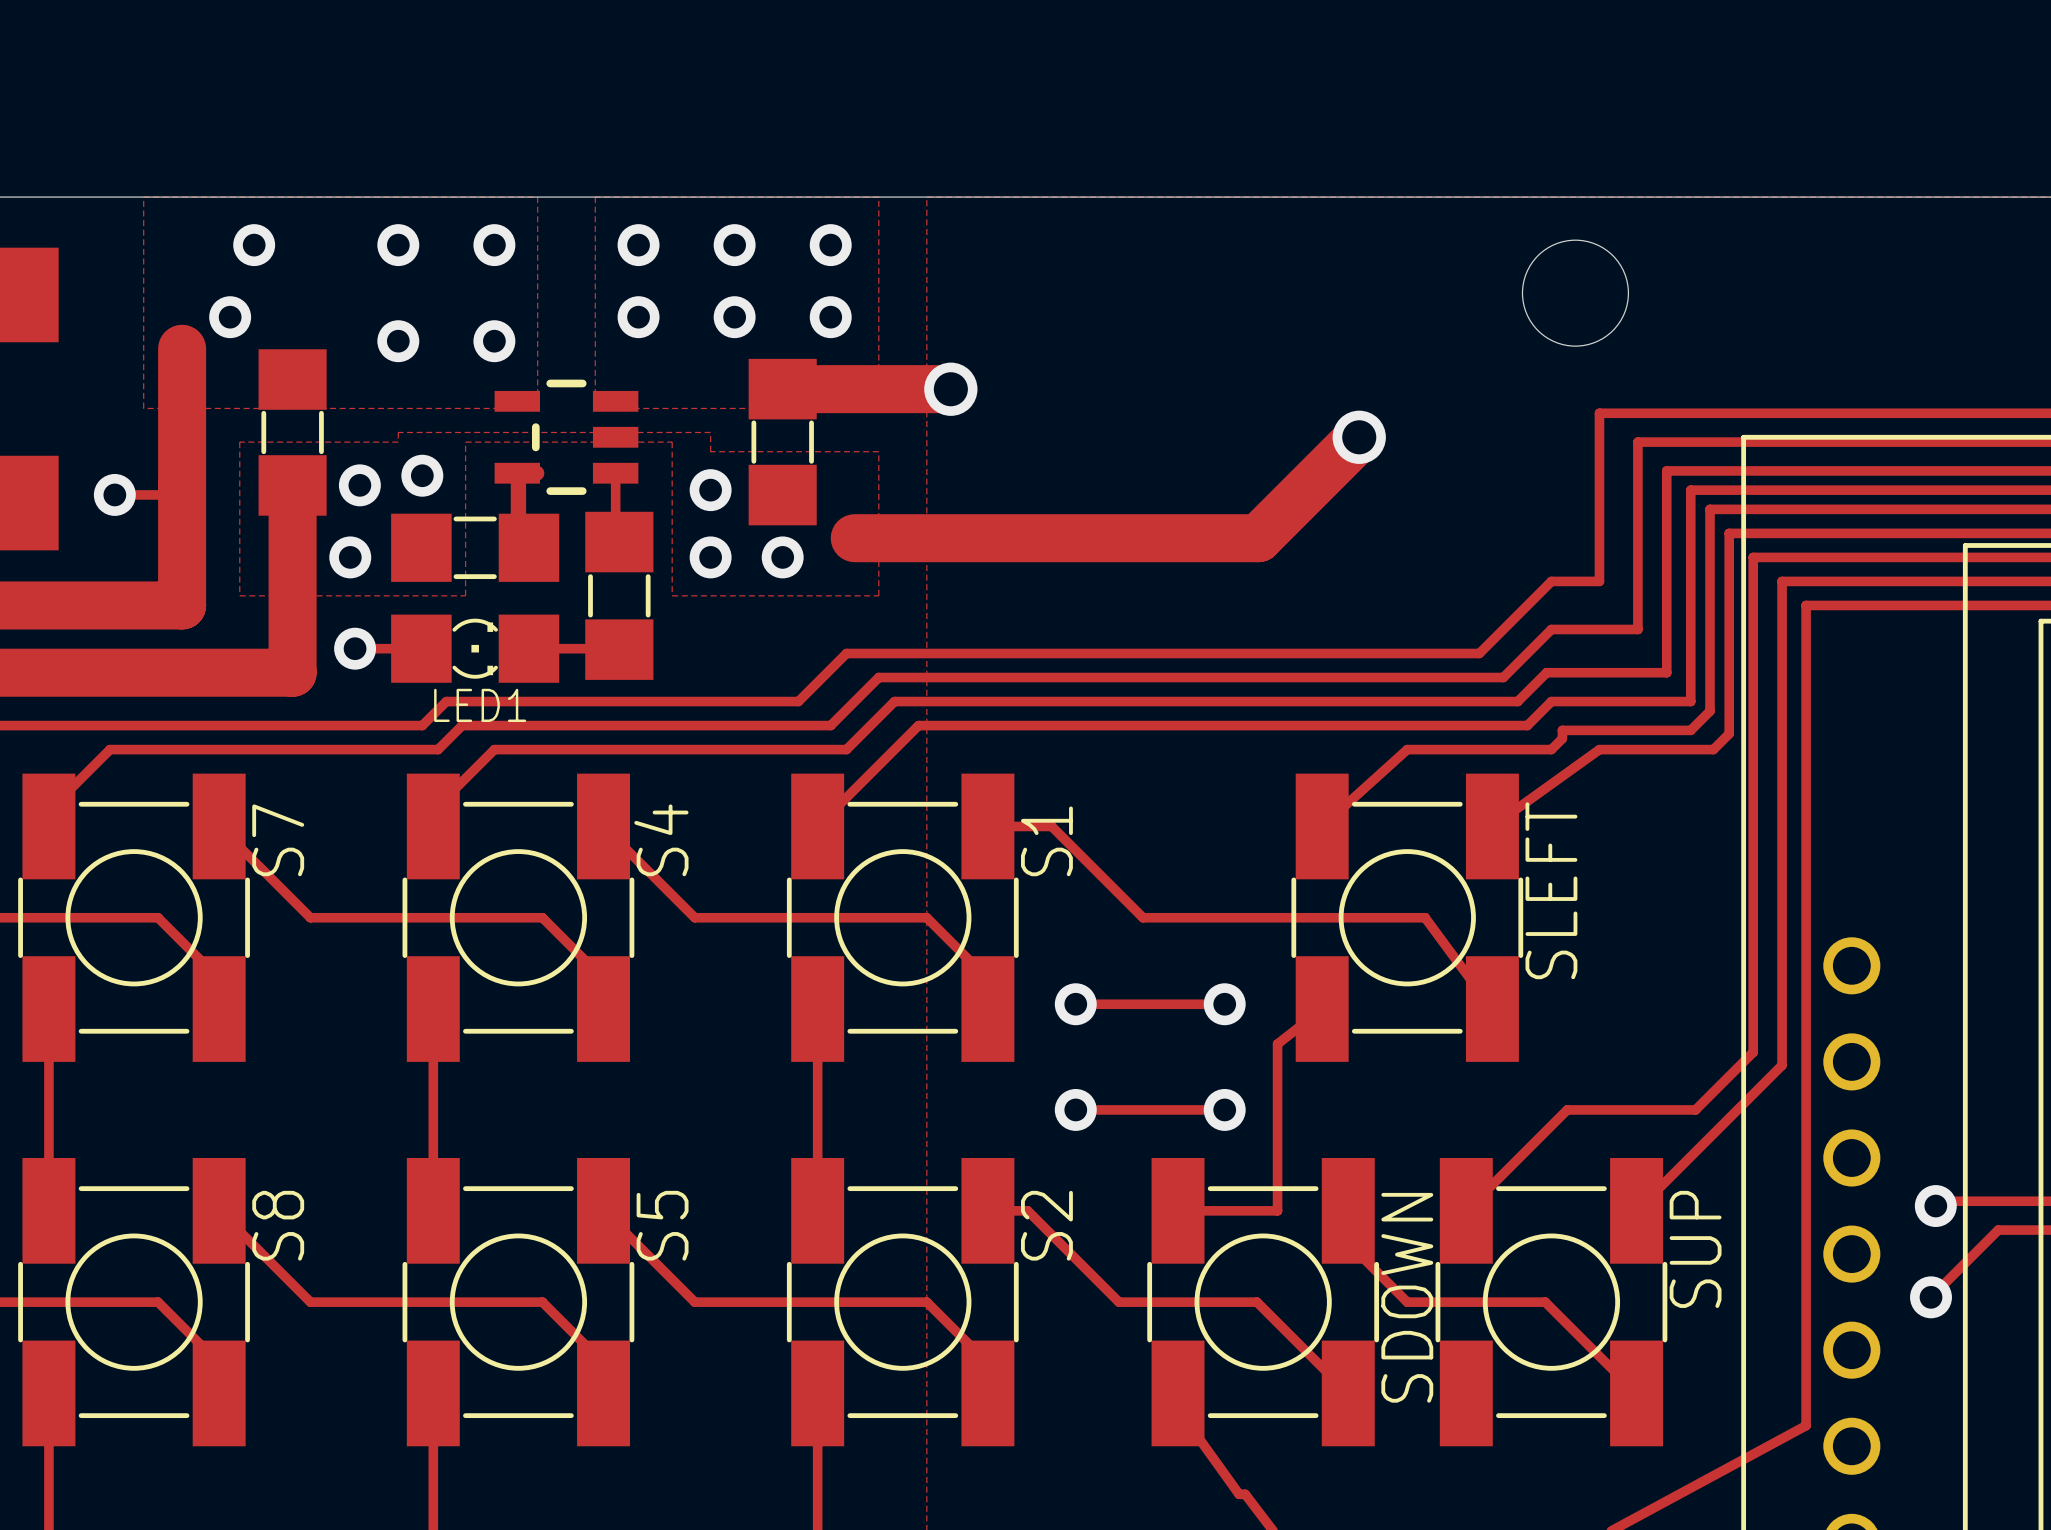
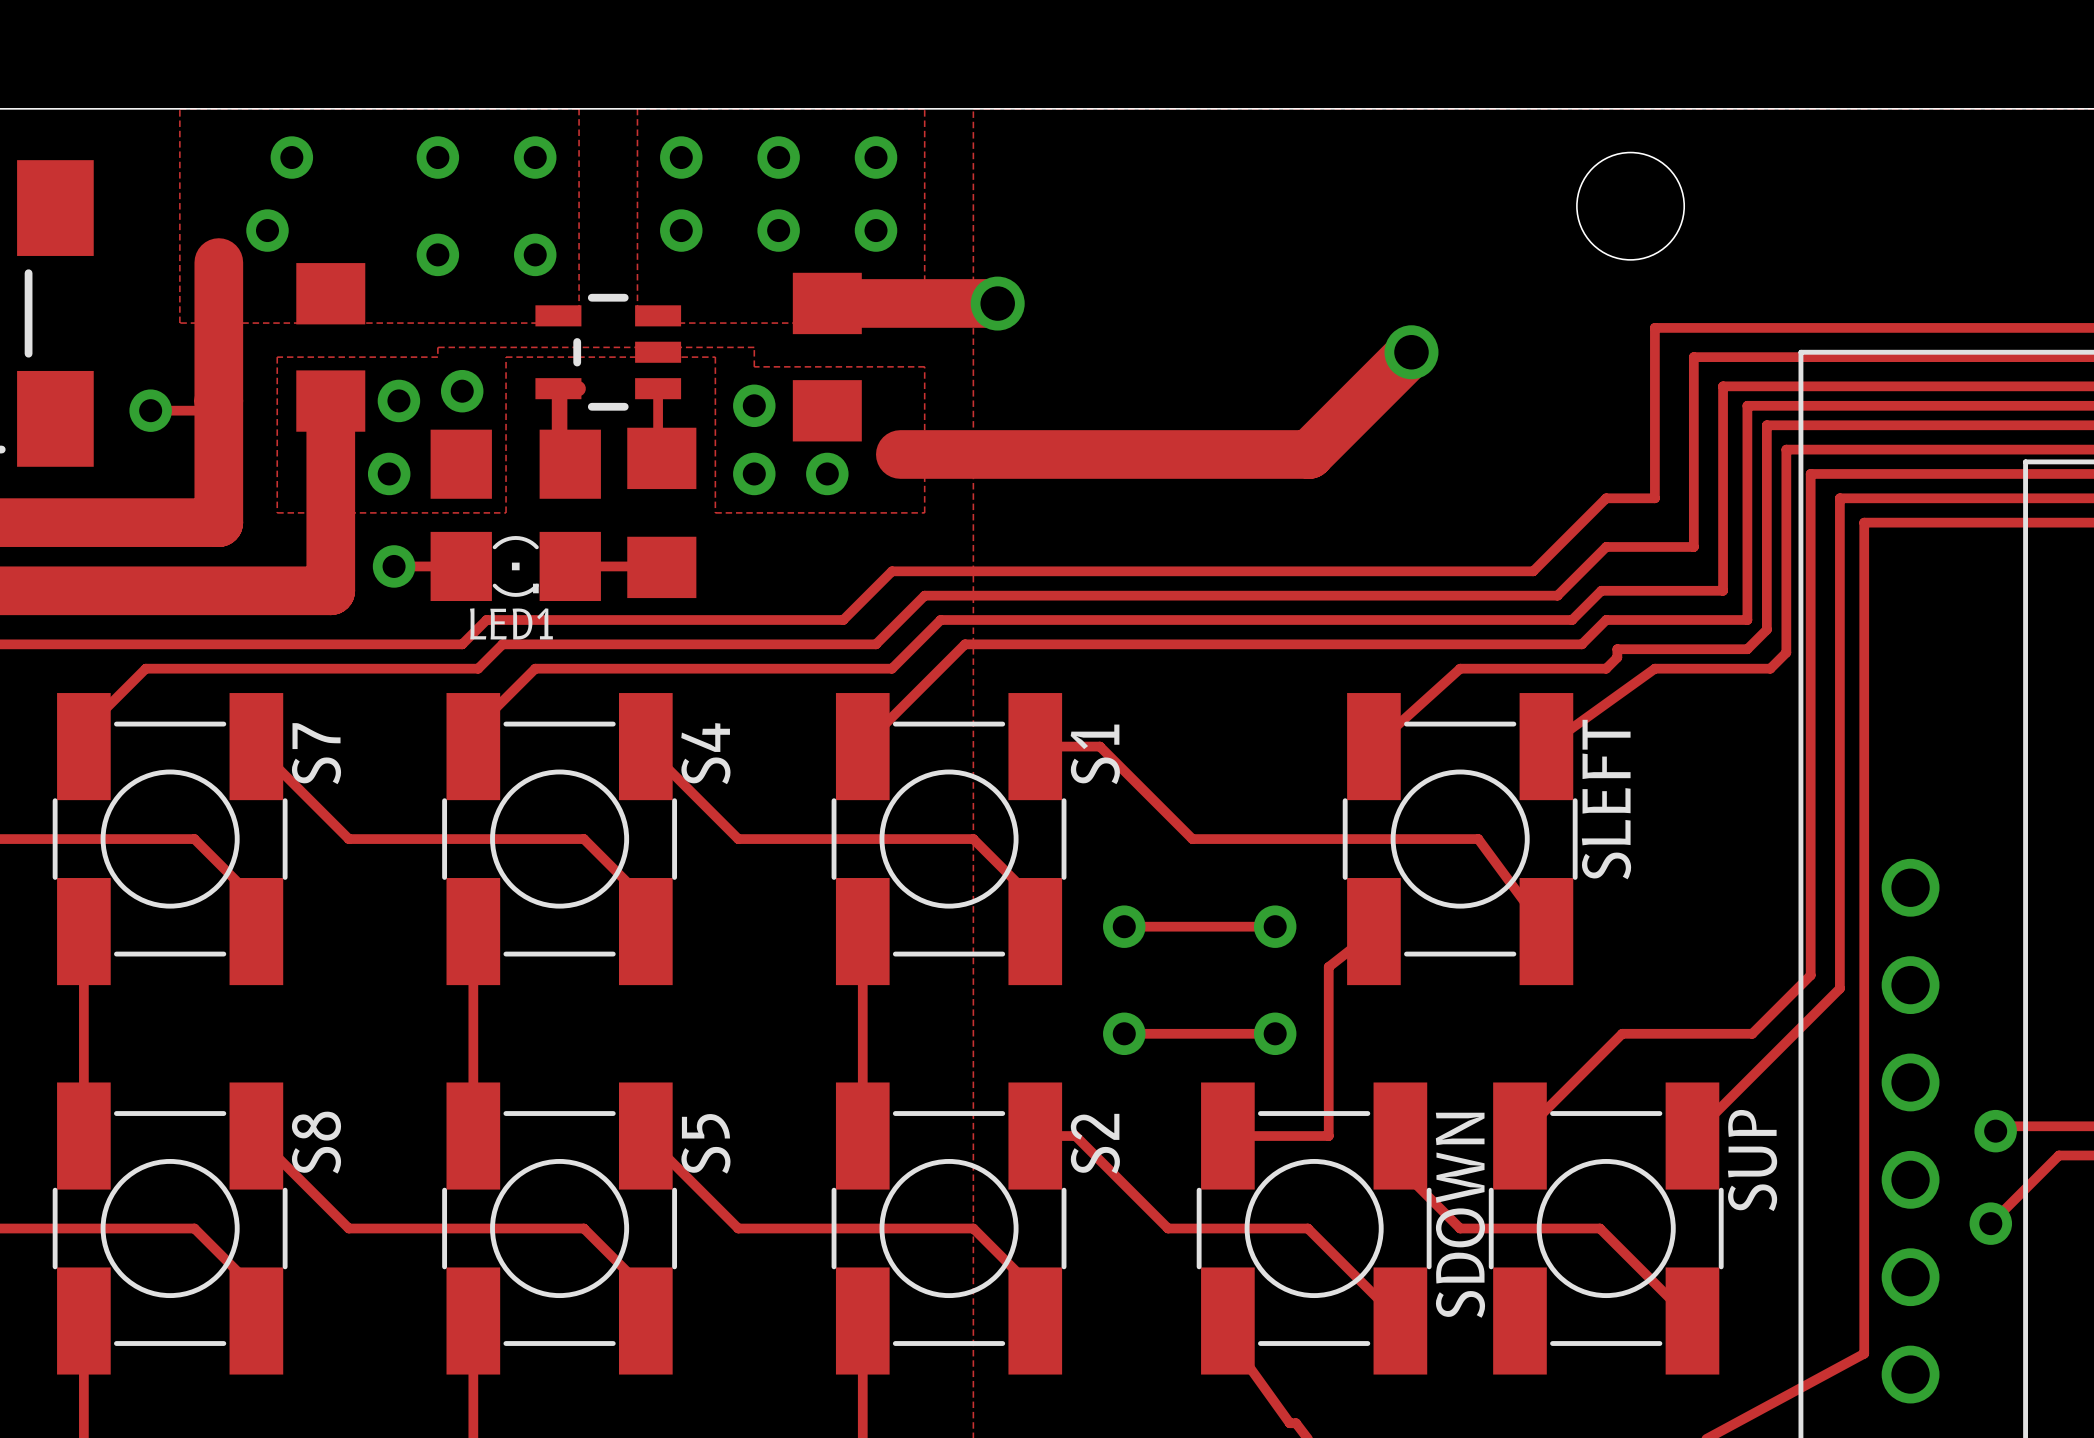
part footprint: [258, 349, 327, 516] -> [296, 263, 366, 432]
part footprint: [748, 358, 817, 526] -> [792, 272, 862, 442]
part footprint: [585, 511, 654, 680] -> [627, 427, 697, 599]
part footprint: [391, 513, 560, 582] -> [430, 429, 601, 499]
LED1 footprint: [391, 614, 560, 683] -> [430, 531, 601, 602]

